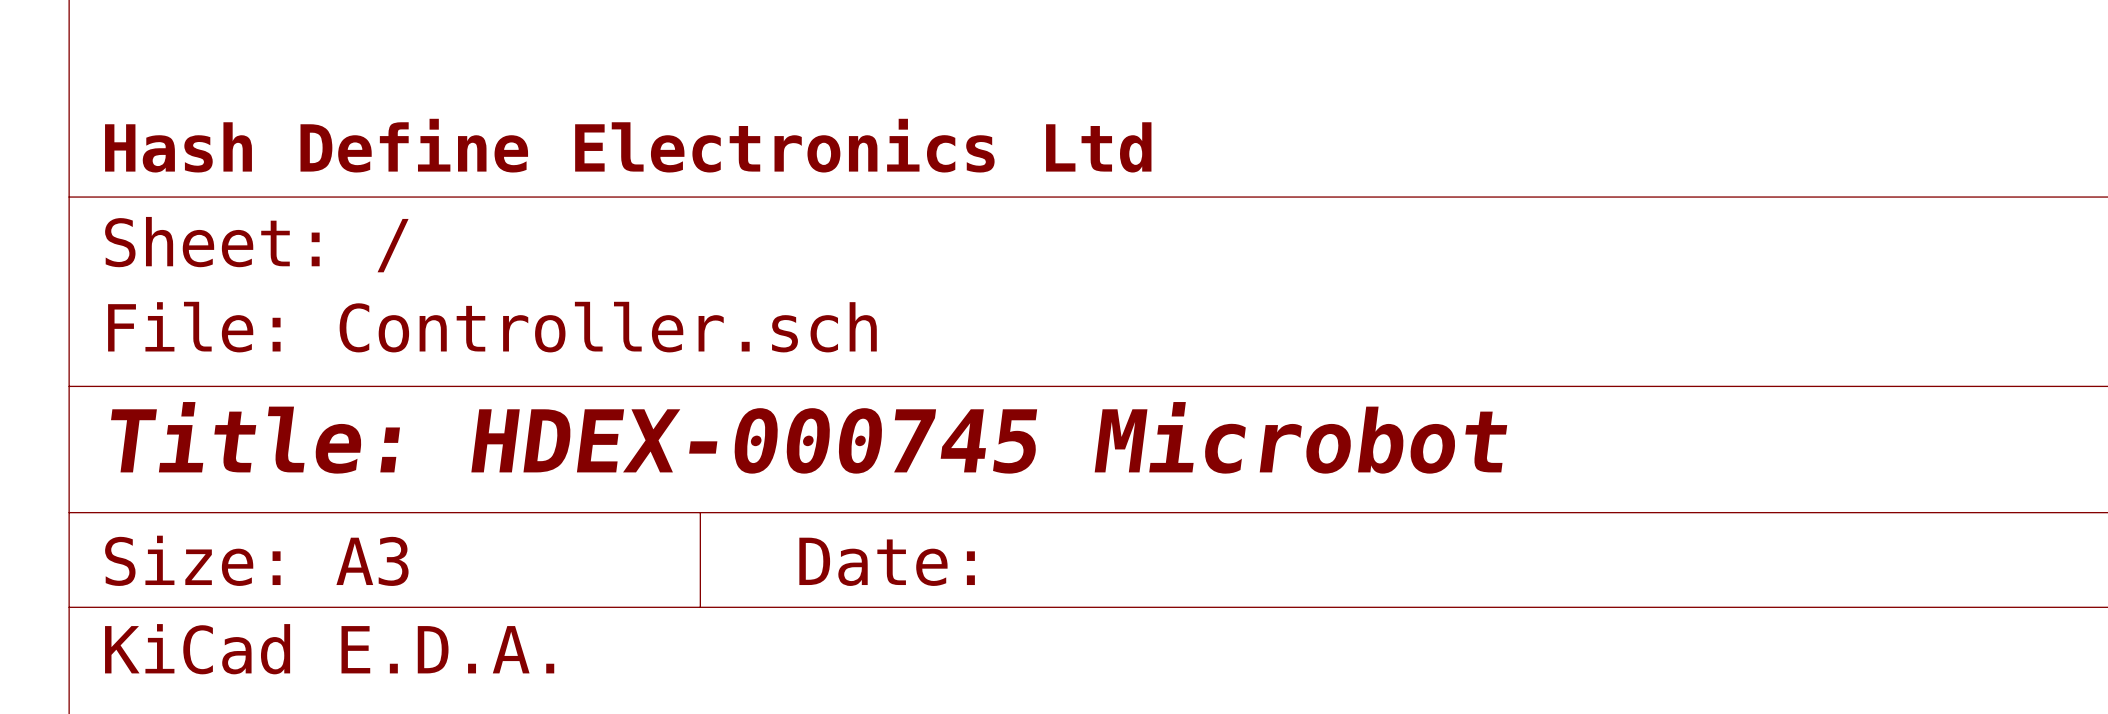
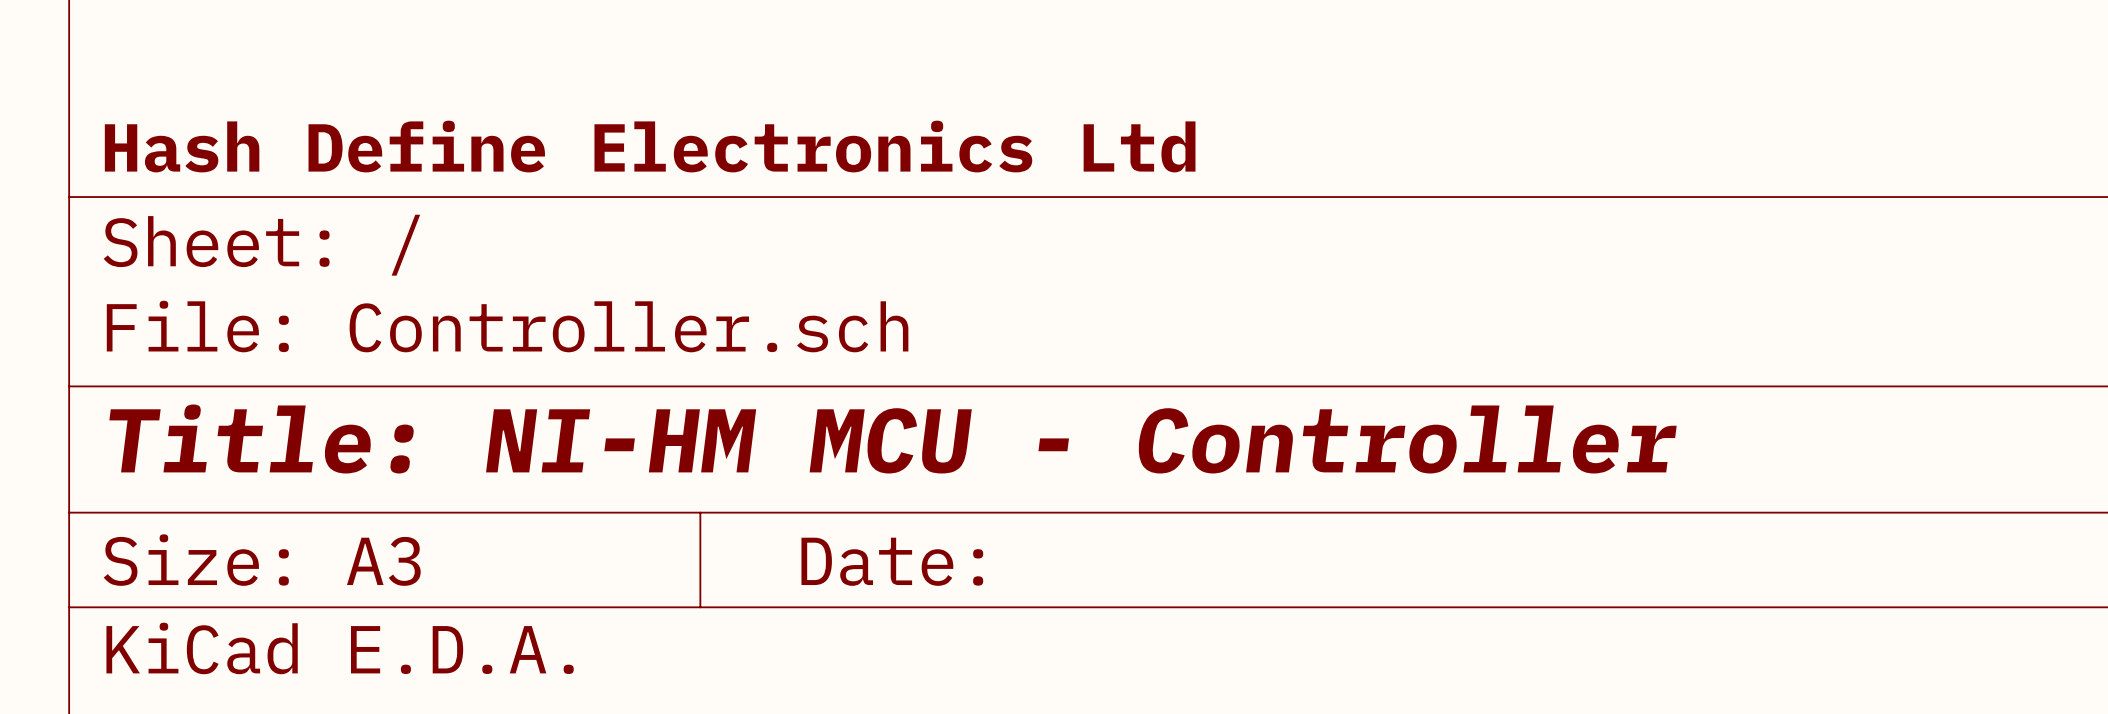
title block: Title: HDEX-000745 Microbot (809, 437) -> Title: NI-HM MCU - Controller (893, 438)

